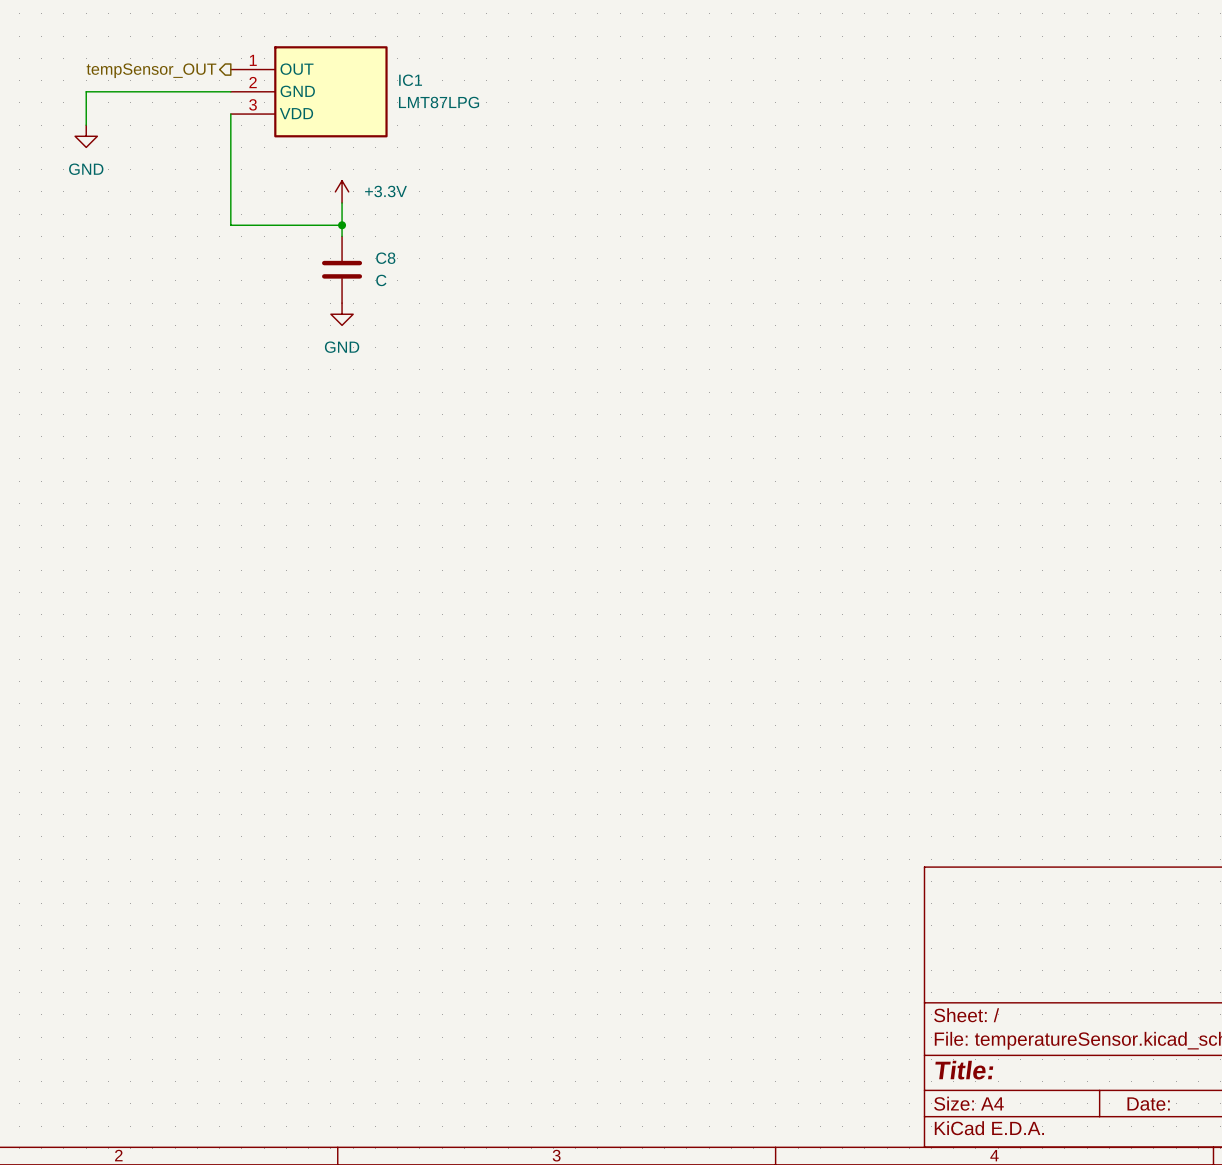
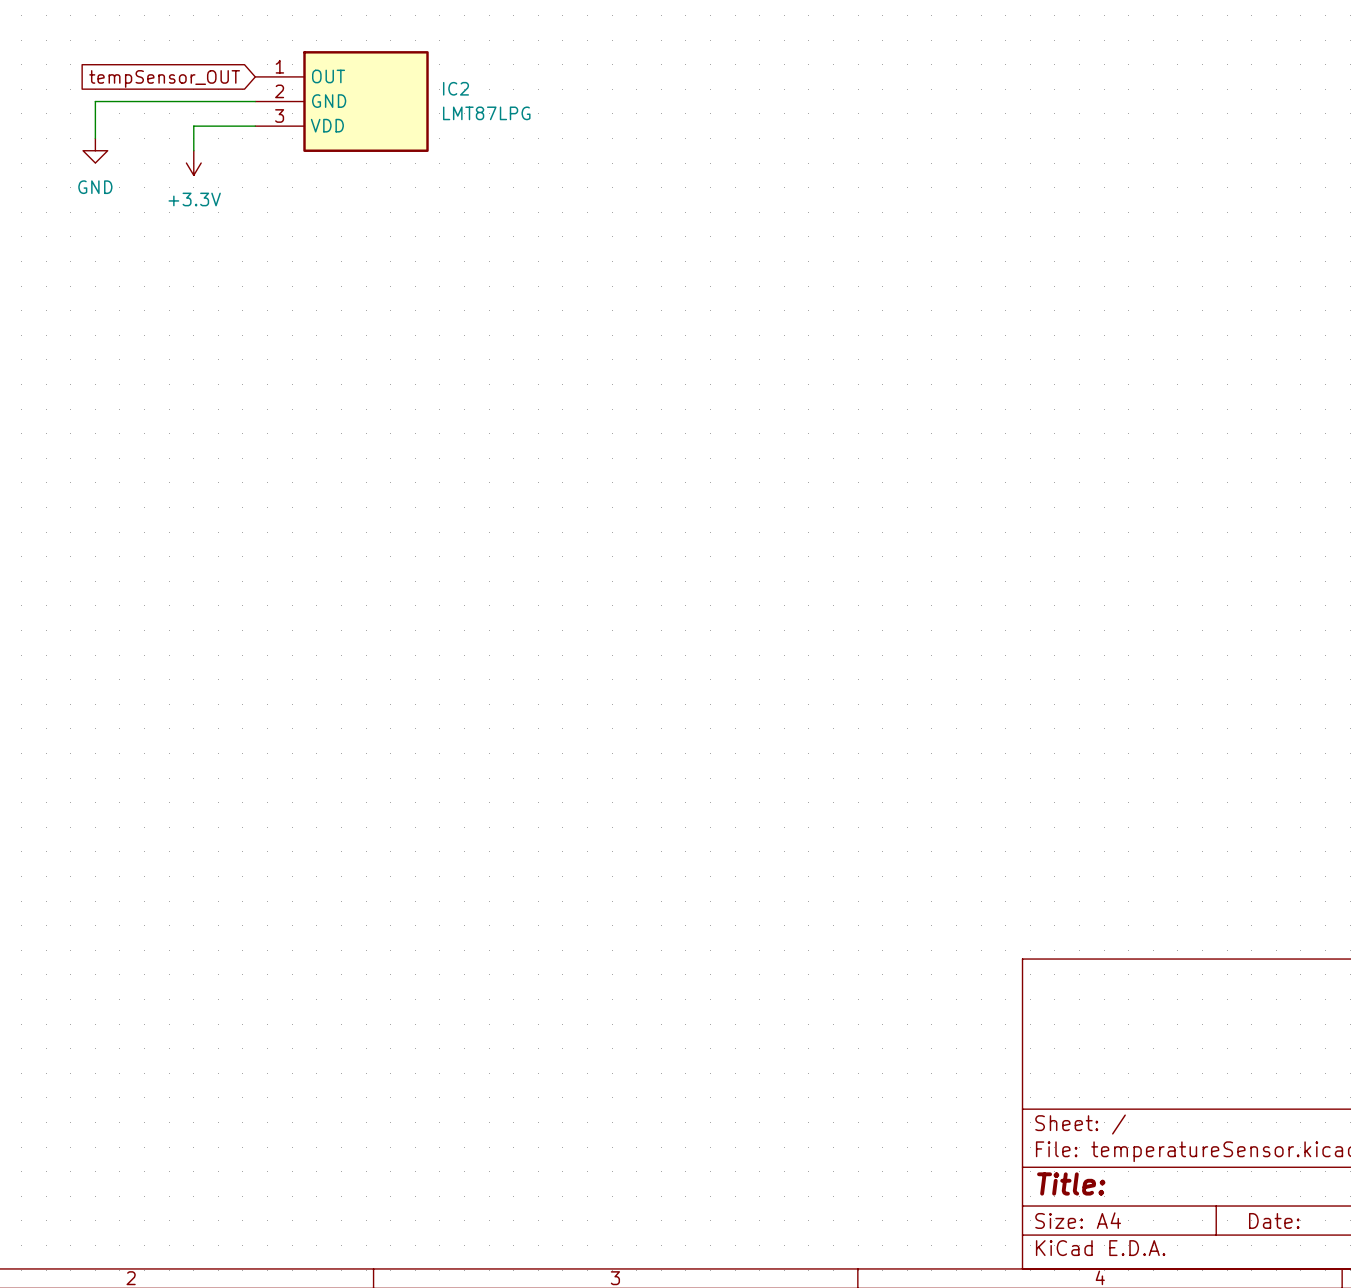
hierarchical label: tempSensor_OUT (151, 70) -> none
global label: none -> tempSensor_OUT (164, 78)
IC1 name: IC1 (410, 80) -> IC2 (456, 88)
wire: (230, 114) (230, 225) (342, 225) -> (255, 126) (193, 126) (193, 150)
power symbol rotation: 0° (342, 191) -> 180° (193, 163)
power symbol position: +3.3V (342, 191) -> +3.3V (193, 163)
power symbol text position: +3.3V (385, 191) -> +3.3V (194, 199)
wire: (342, 203) (342, 236) -> none
junction: (342, 225) -> none
C8: C (342, 269) -> none
power symbol: GND (342, 314) -> none

